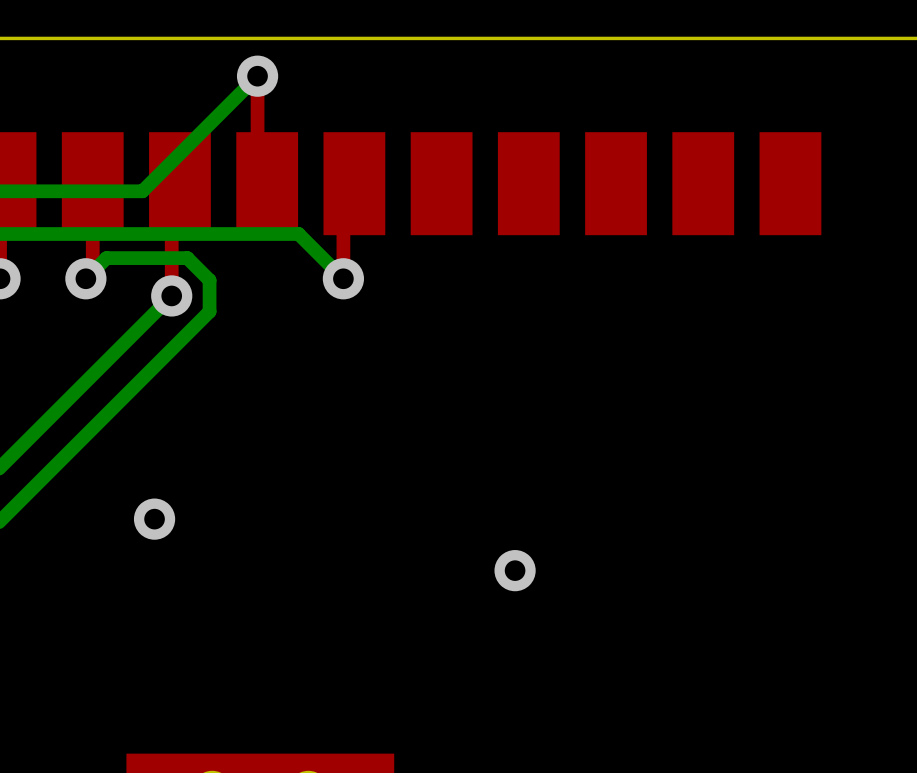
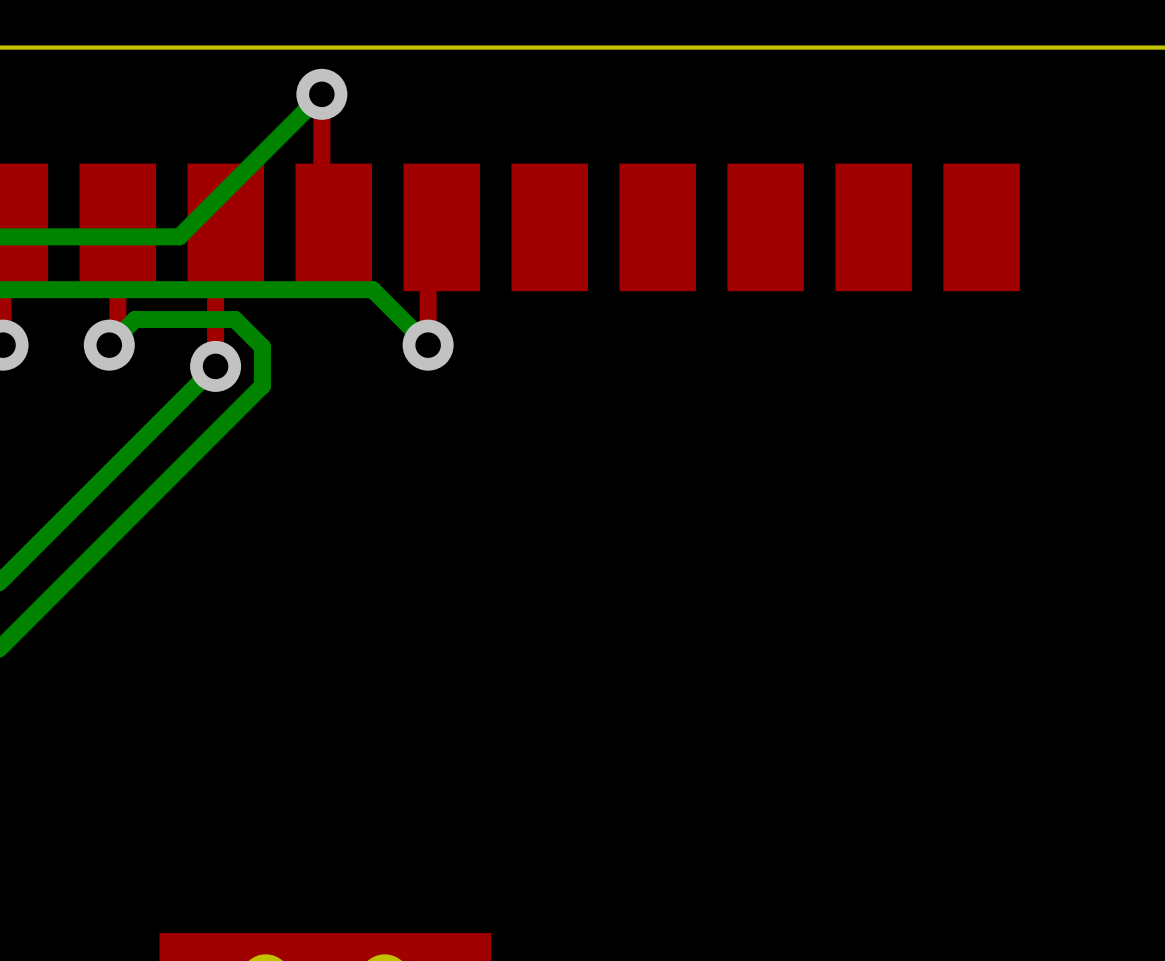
via: (154, 519) -> none
via: (515, 570) -> none

